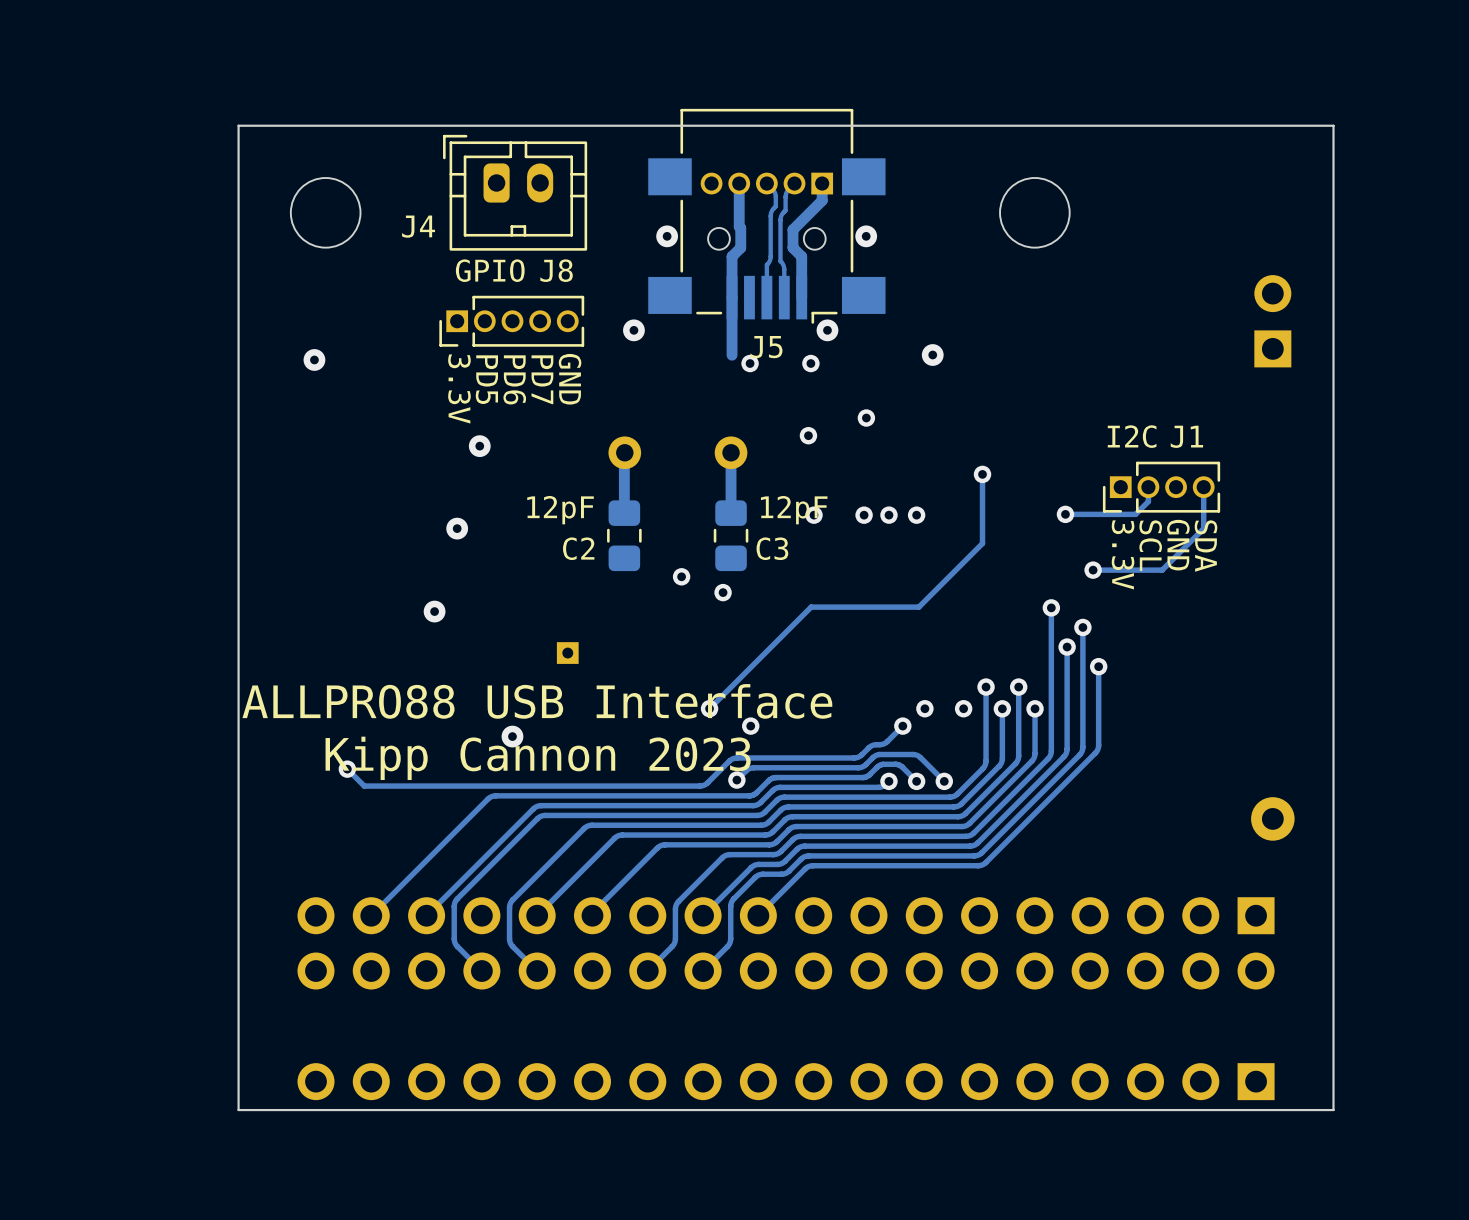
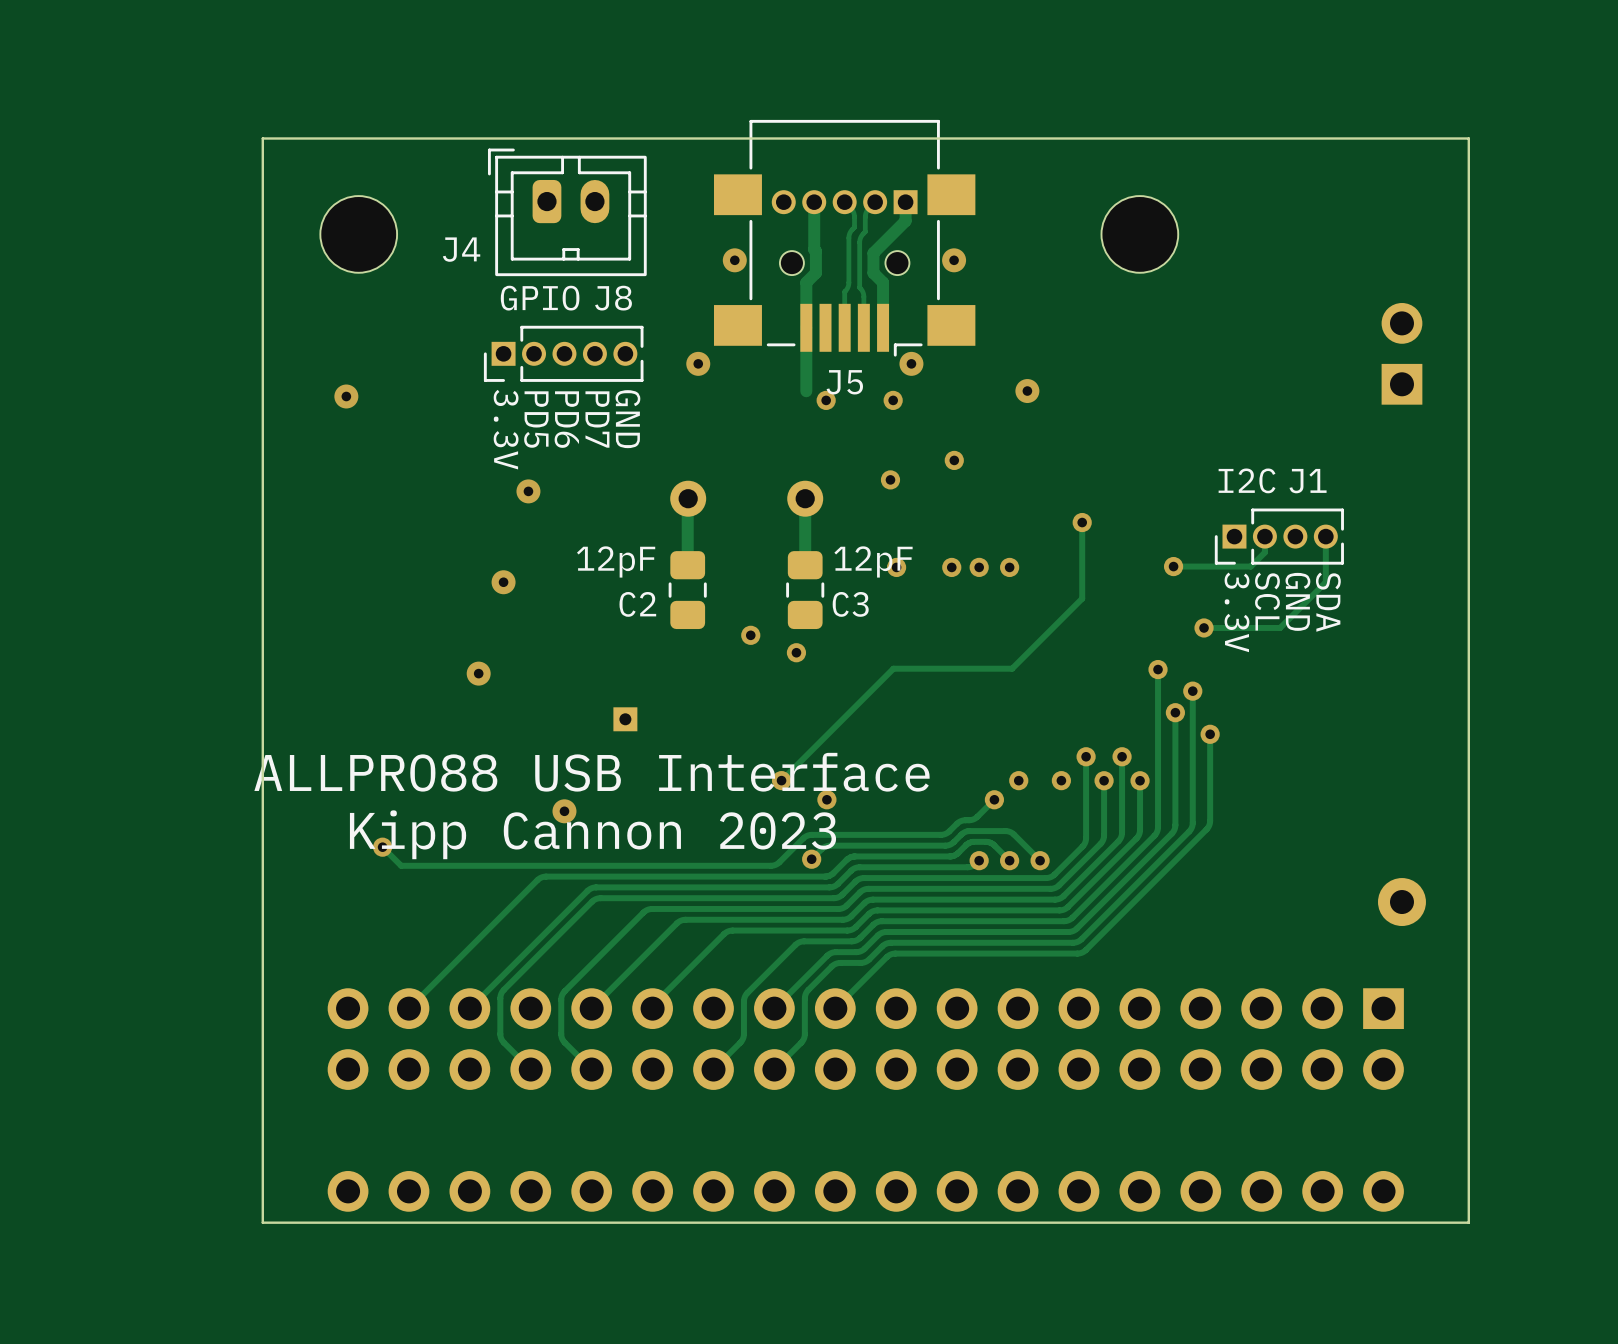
part footprint: [297, 1063, 1275, 1101] -> [327, 1170, 1404, 1212]

